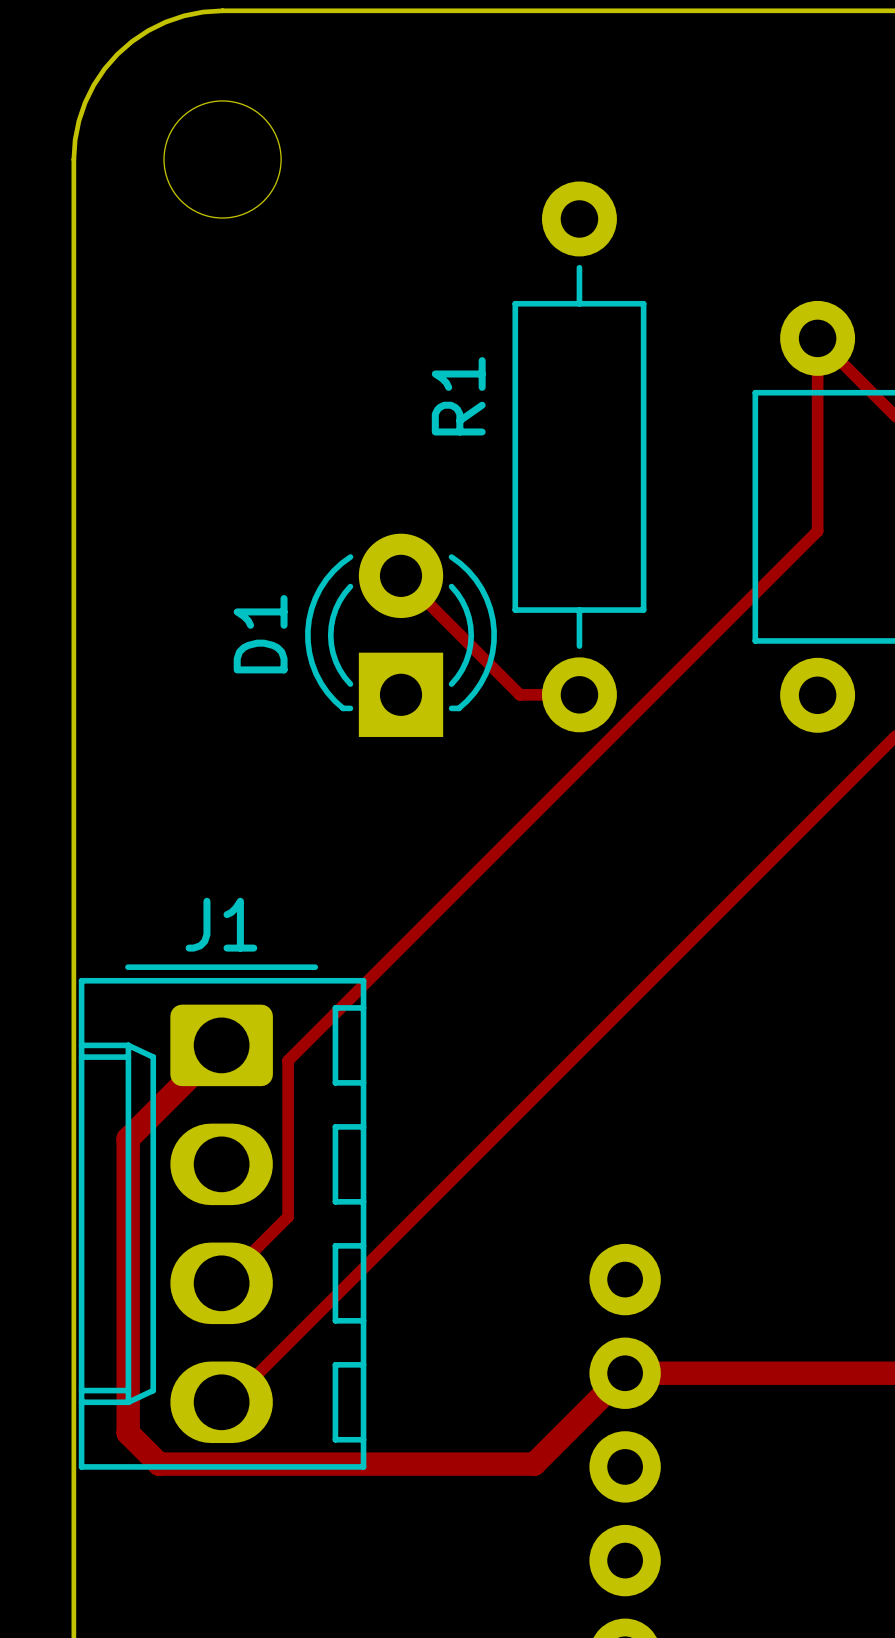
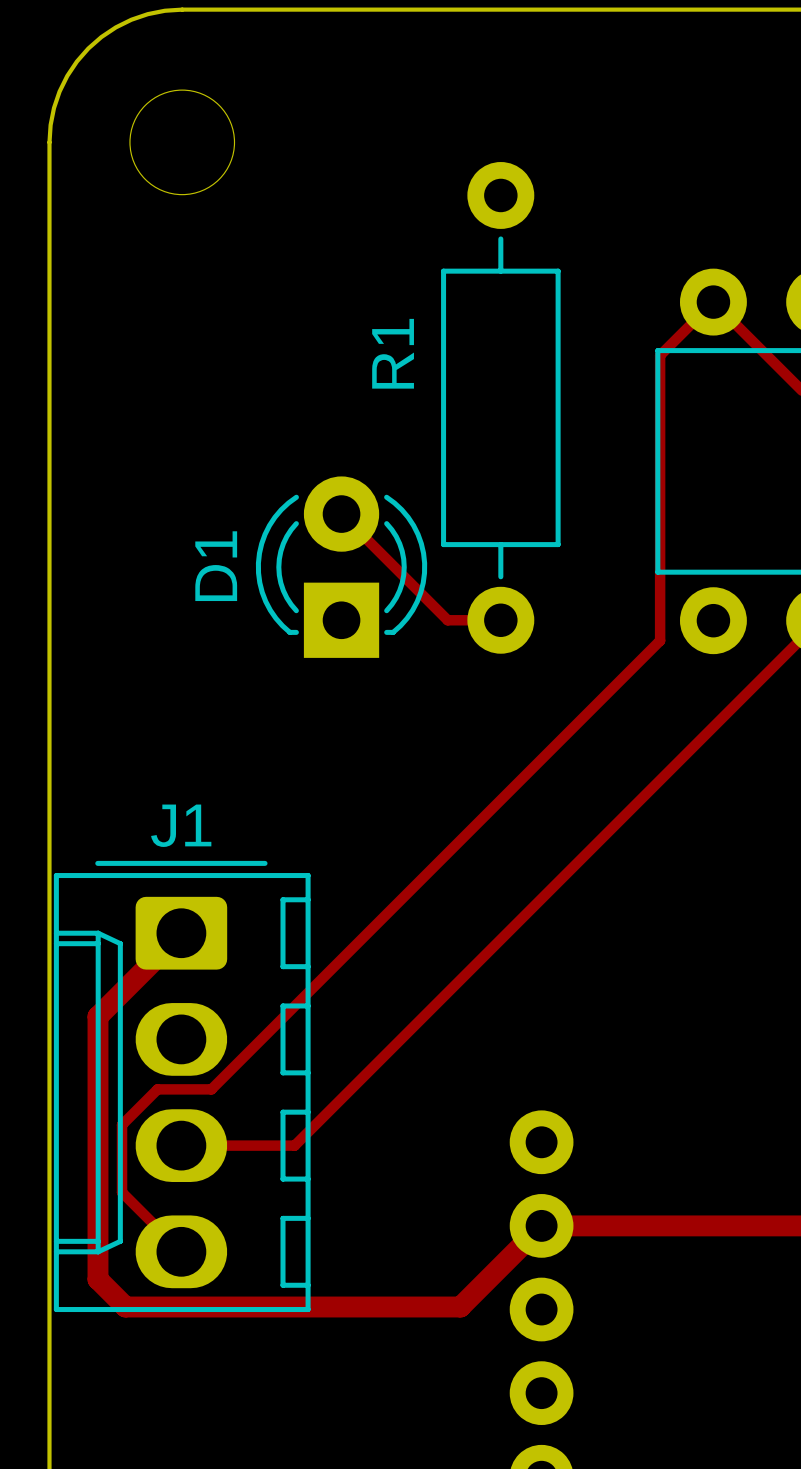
track: (817, 338) (817, 531) (288, 1060) (288, 1216) (221, 1283) -> (713, 302) (660, 355) (660, 640) (211, 1089) (157, 1089) (122, 1124) (122, 1192) (181, 1251)
track: (348, 1283) (229, 1402) (221, 1402) -> (294, 1145) (181, 1145)

